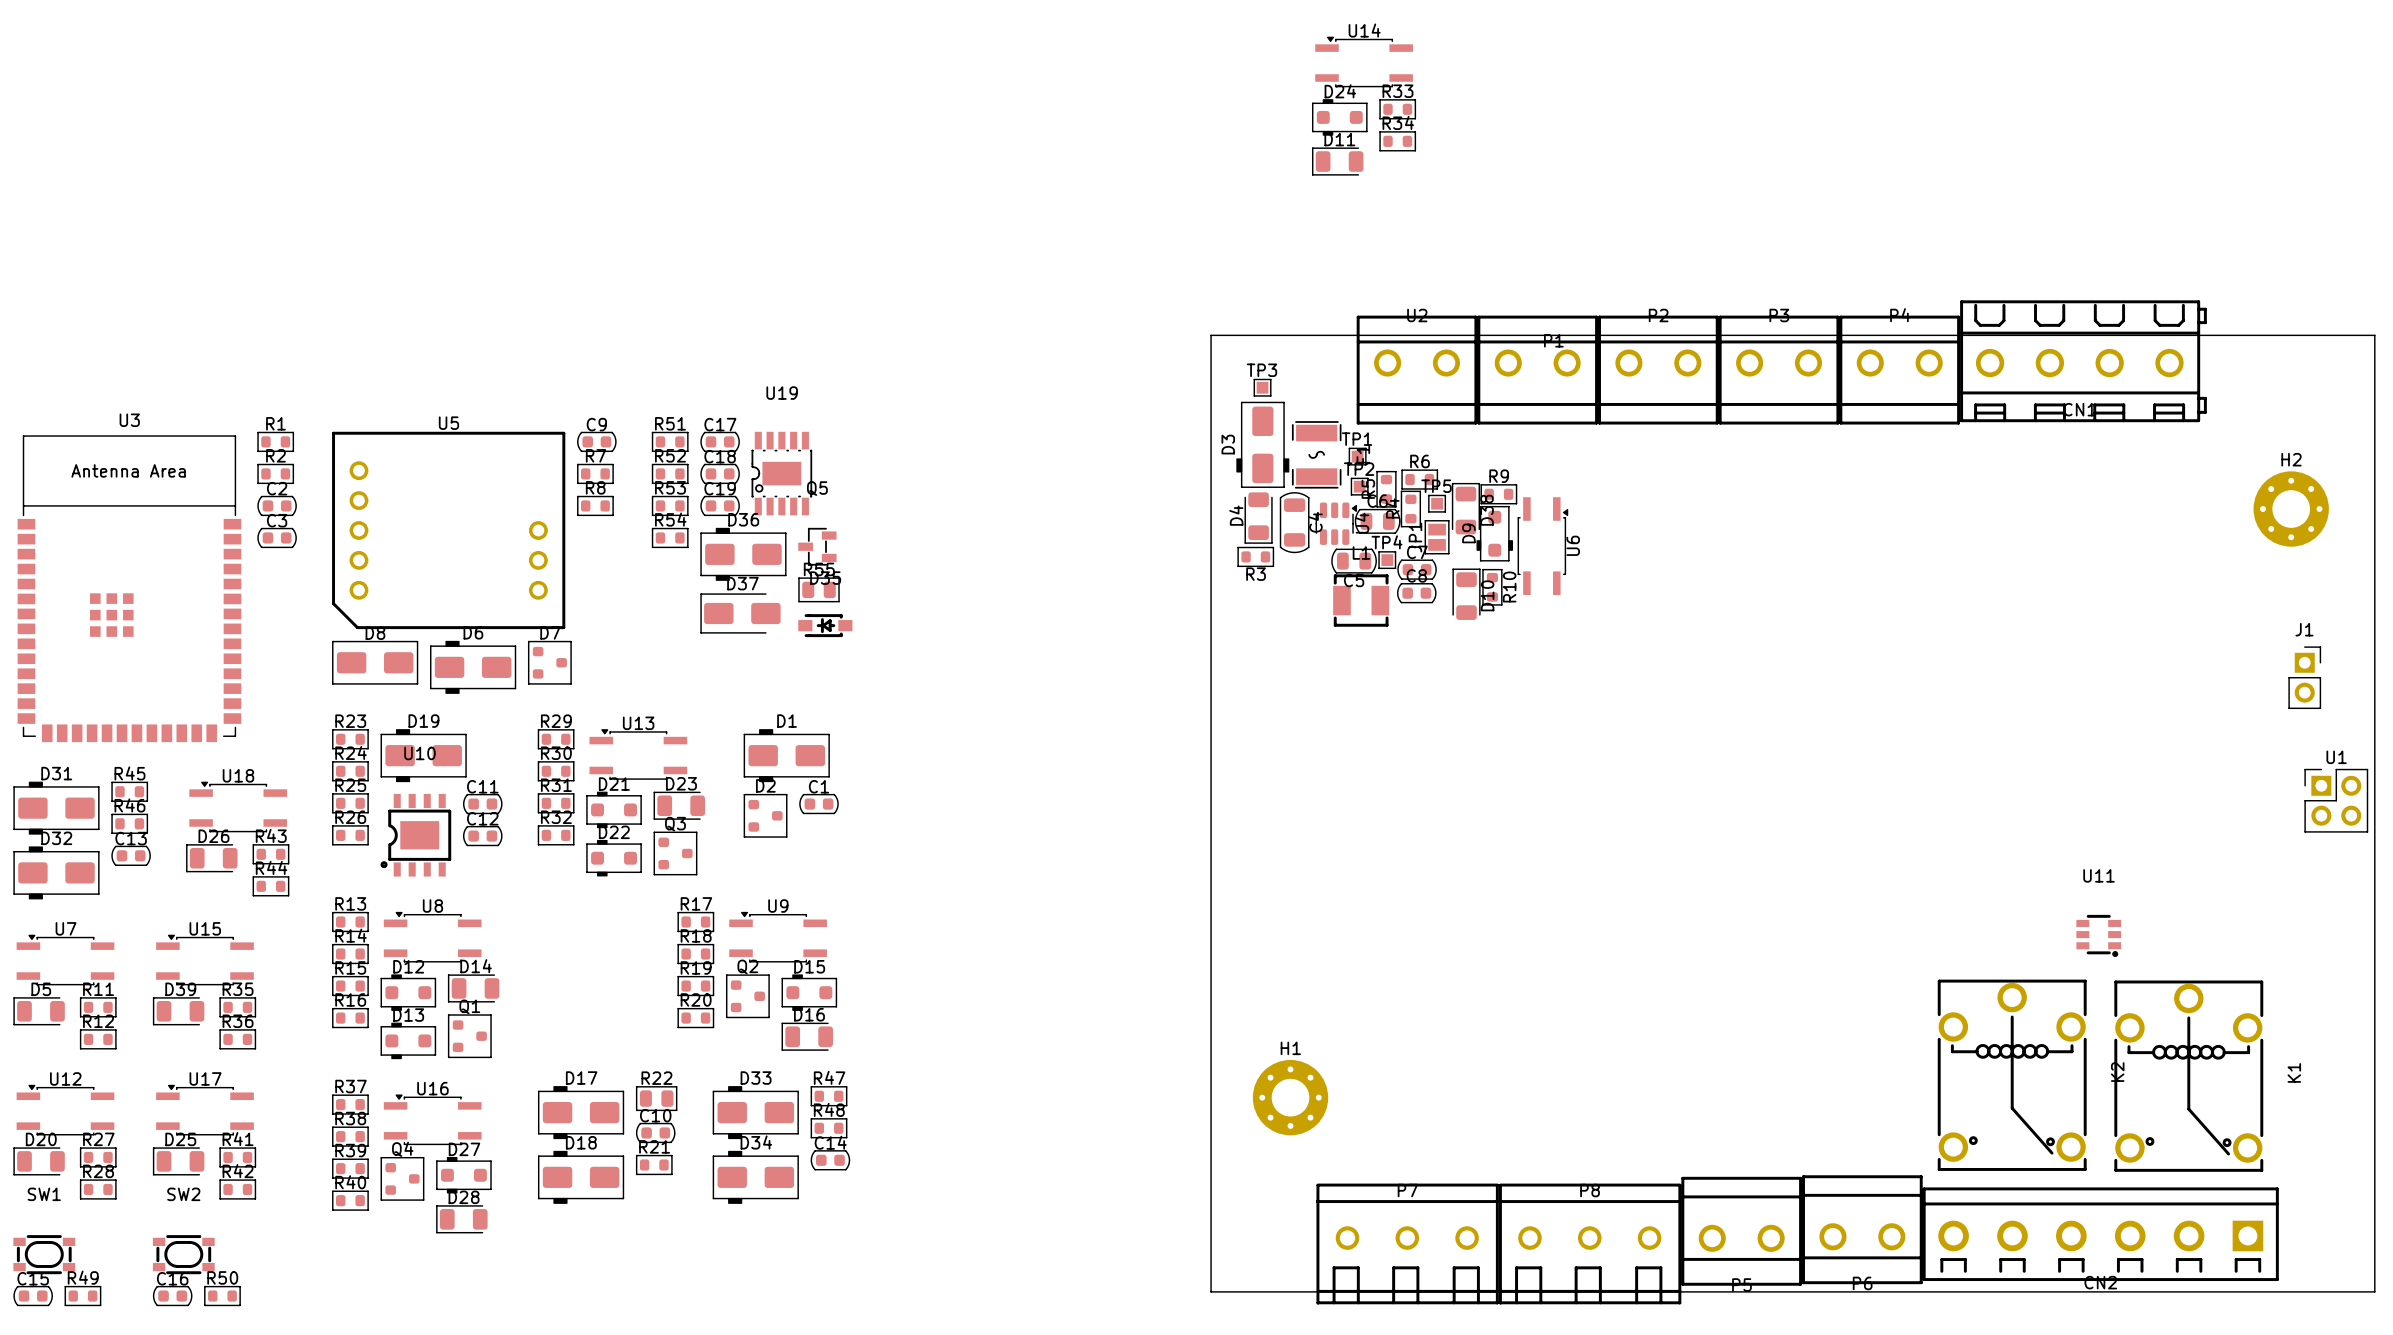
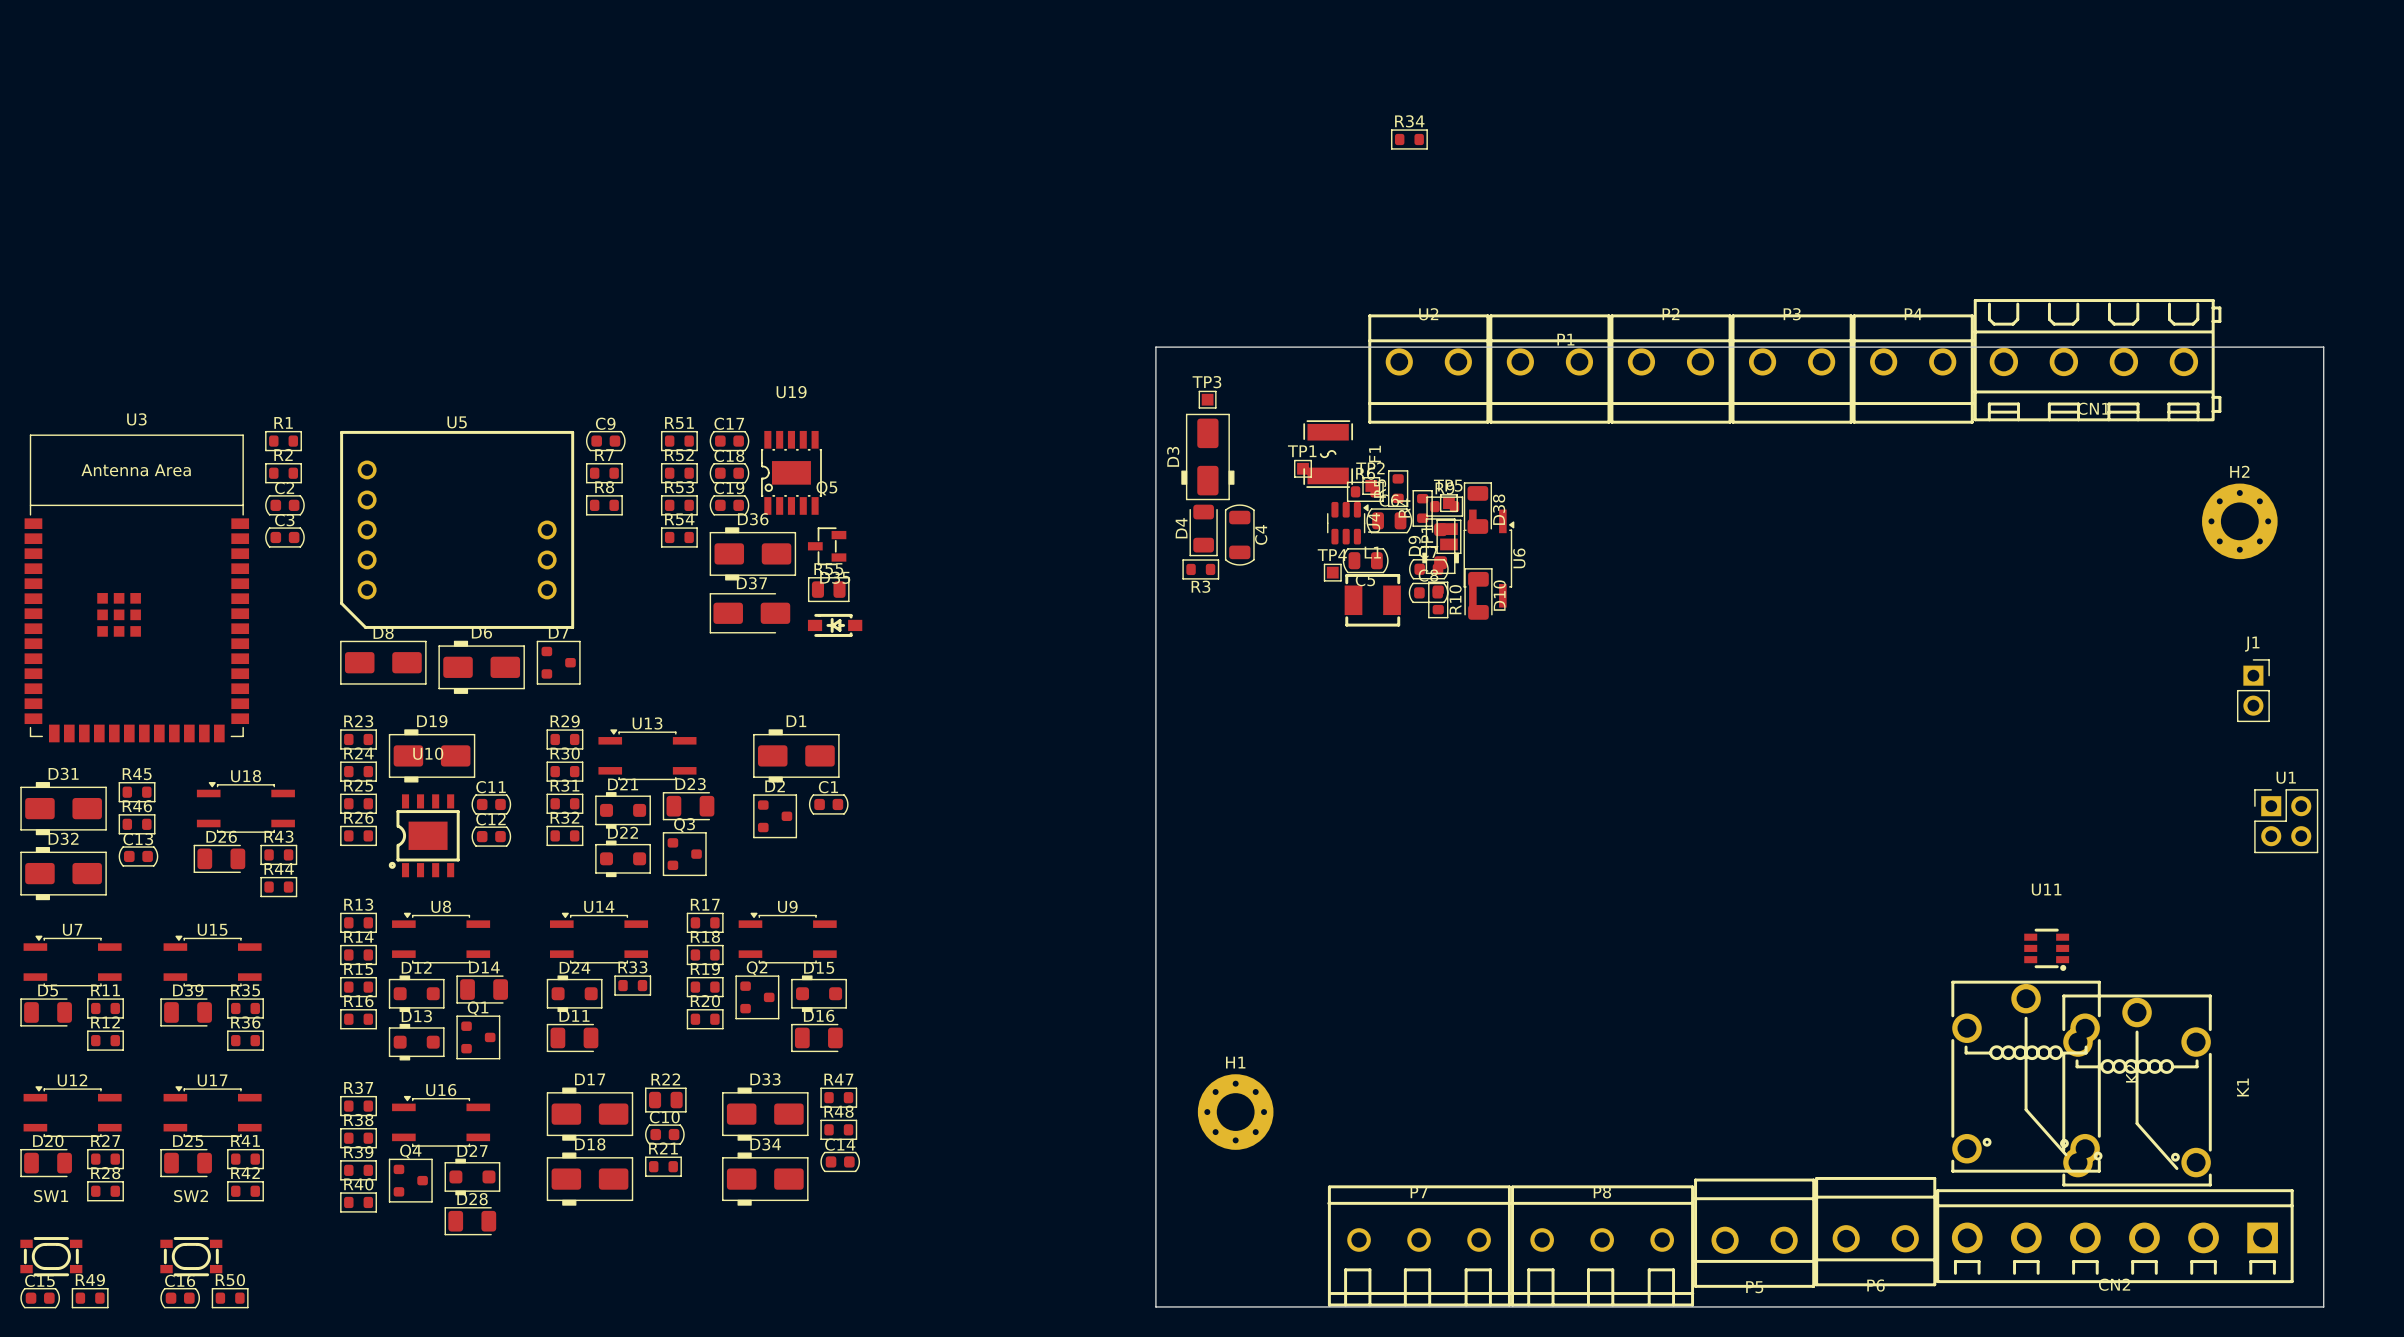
U14 position: (1364, 61) -> (599, 938)
R33 position: (1397, 109) -> (632, 985)
D24 position: (1339, 117) -> (574, 993)
D11 position: (1337, 161) -> (572, 1037)
board edge: (1211, 335) (2374, 335) (2374, 1291) (1211, 1291) (1211, 335) -> (1155, 347) (2323, 347) (2323, 1306) (1155, 1306) (1155, 347)
TP3 position: (1262, 387) -> (1207, 399)
D3 position: (1262, 444) -> (1207, 456)
TP1 position: (1357, 456) -> (1302, 468)
R6 position: (1419, 479) -> (1365, 491)
R9 position: (1498, 494) -> (1444, 506)
H2 position: (2291, 509) -> (2239, 521)
D4 position: (1258, 518) -> (1203, 530)
C4 position: (1294, 522) -> (1239, 535)
D9 position: (1494, 533) -> (1440, 546)
U6 position: (1542, 546) -> (1488, 558)
R3 position: (1255, 556) -> (1200, 569)
TP4 position: (1387, 560) -> (1332, 572)
R10 position: (1492, 587) -> (1438, 599)
J1 position: (2304, 677) -> (2253, 690)
U1 position: (2336, 800) -> (2286, 821)
U11 position: (2098, 935) -> (2046, 949)
K1 position: (2188, 1076) -> (2137, 1090)
H1 position: (1290, 1097) -> (1235, 1112)

